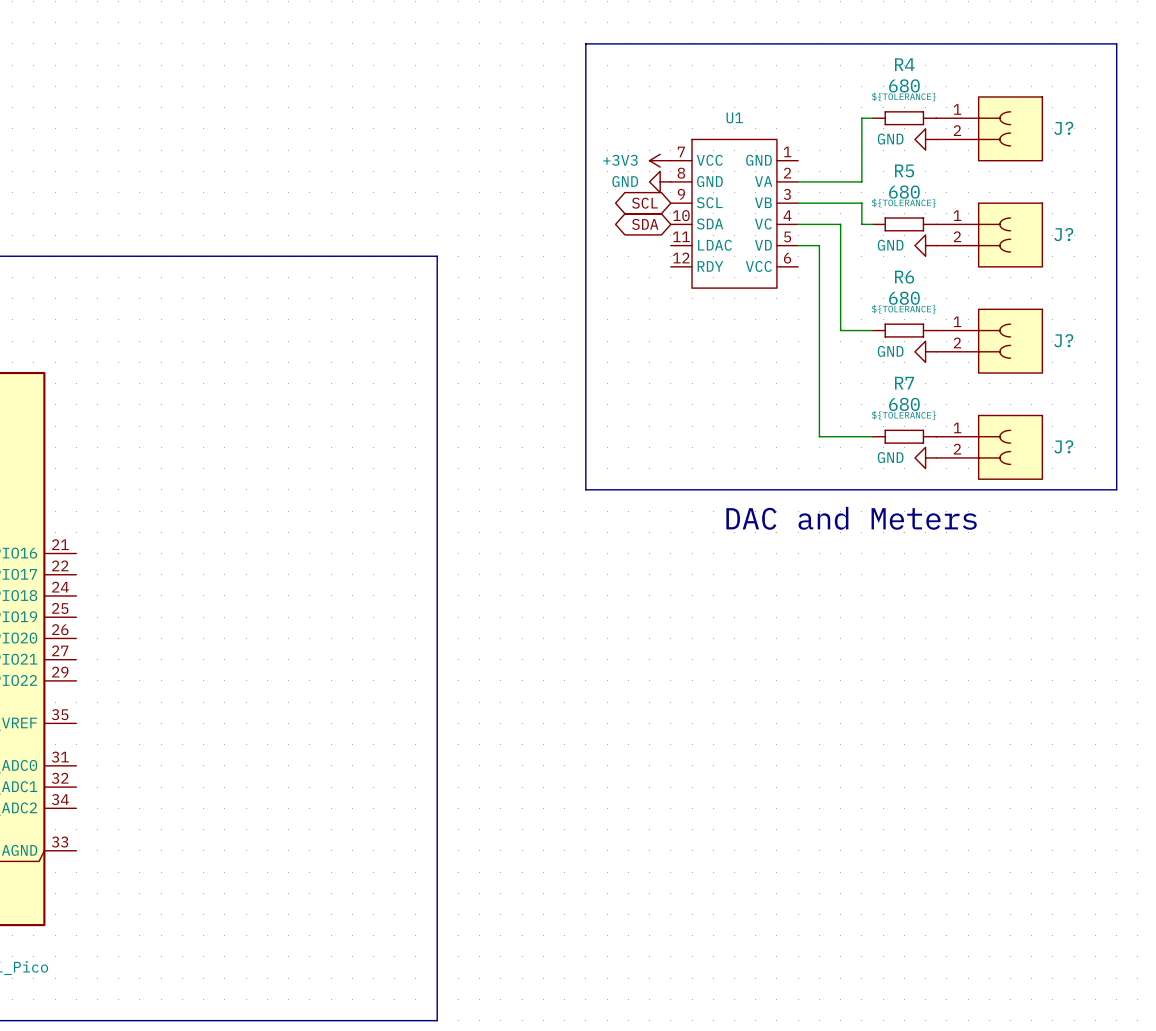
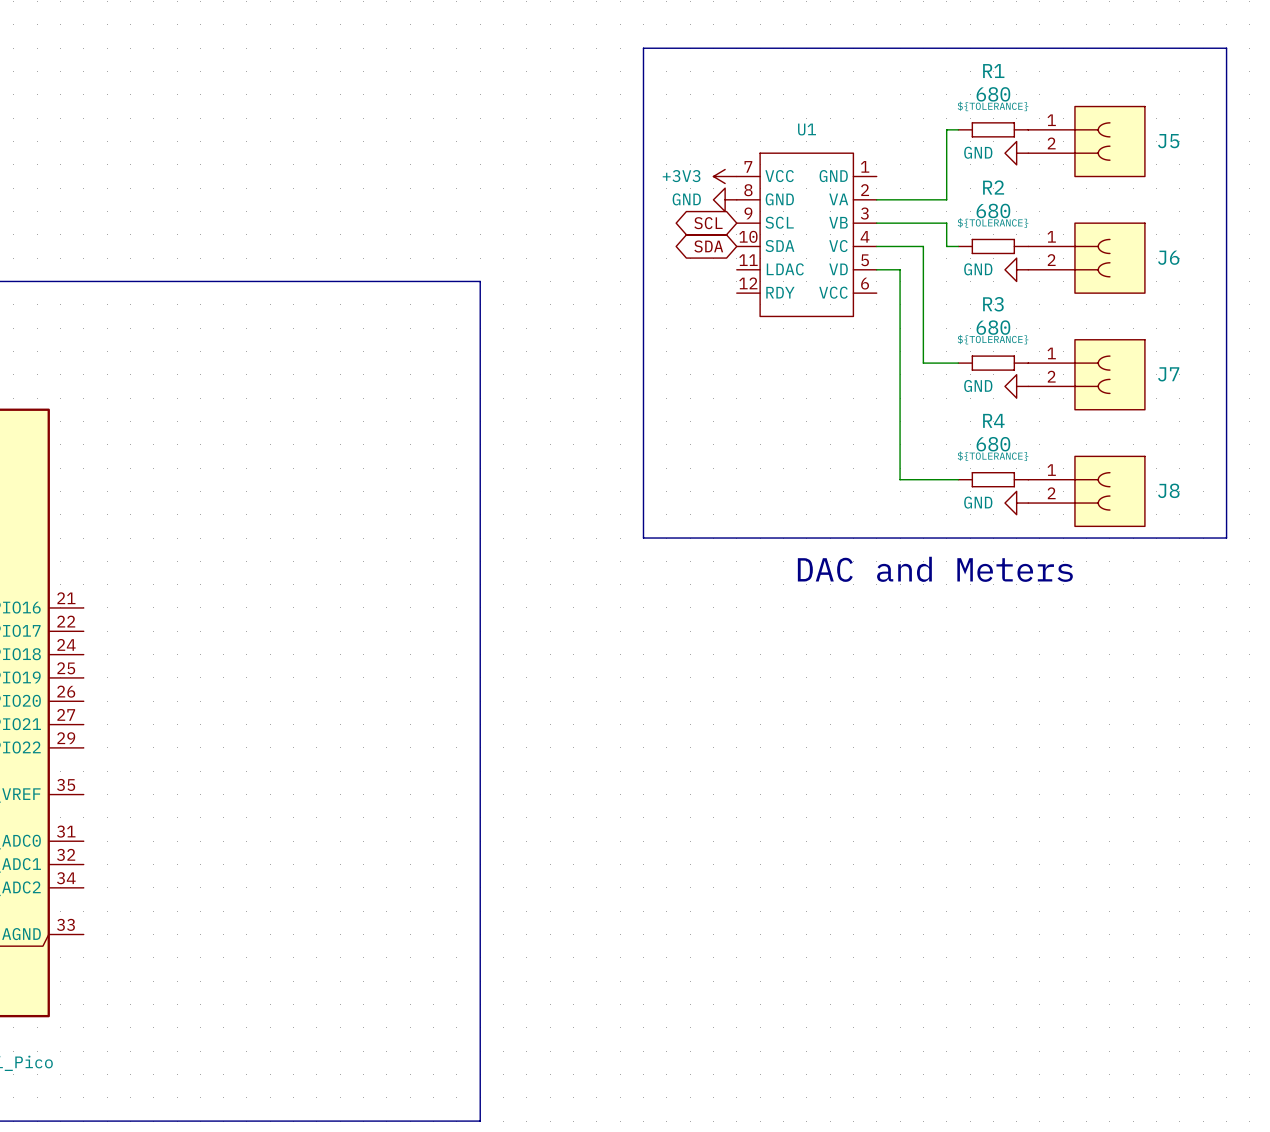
R4 name: R4 (904, 64) -> R1 (993, 71)
J? name: J? (1063, 128) -> J5 (1168, 141)
R5 name: R5 (904, 170) -> R2 (993, 187)
J? name: J? (1063, 234) -> J6 (1168, 257)
R6 name: R6 (904, 277) -> R3 (993, 304)
J? name: J? (1063, 340) -> J7 (1168, 374)
R7 name: R7 (904, 383) -> R4 (993, 420)
J? name: J? (1063, 446) -> J8 (1168, 490)

